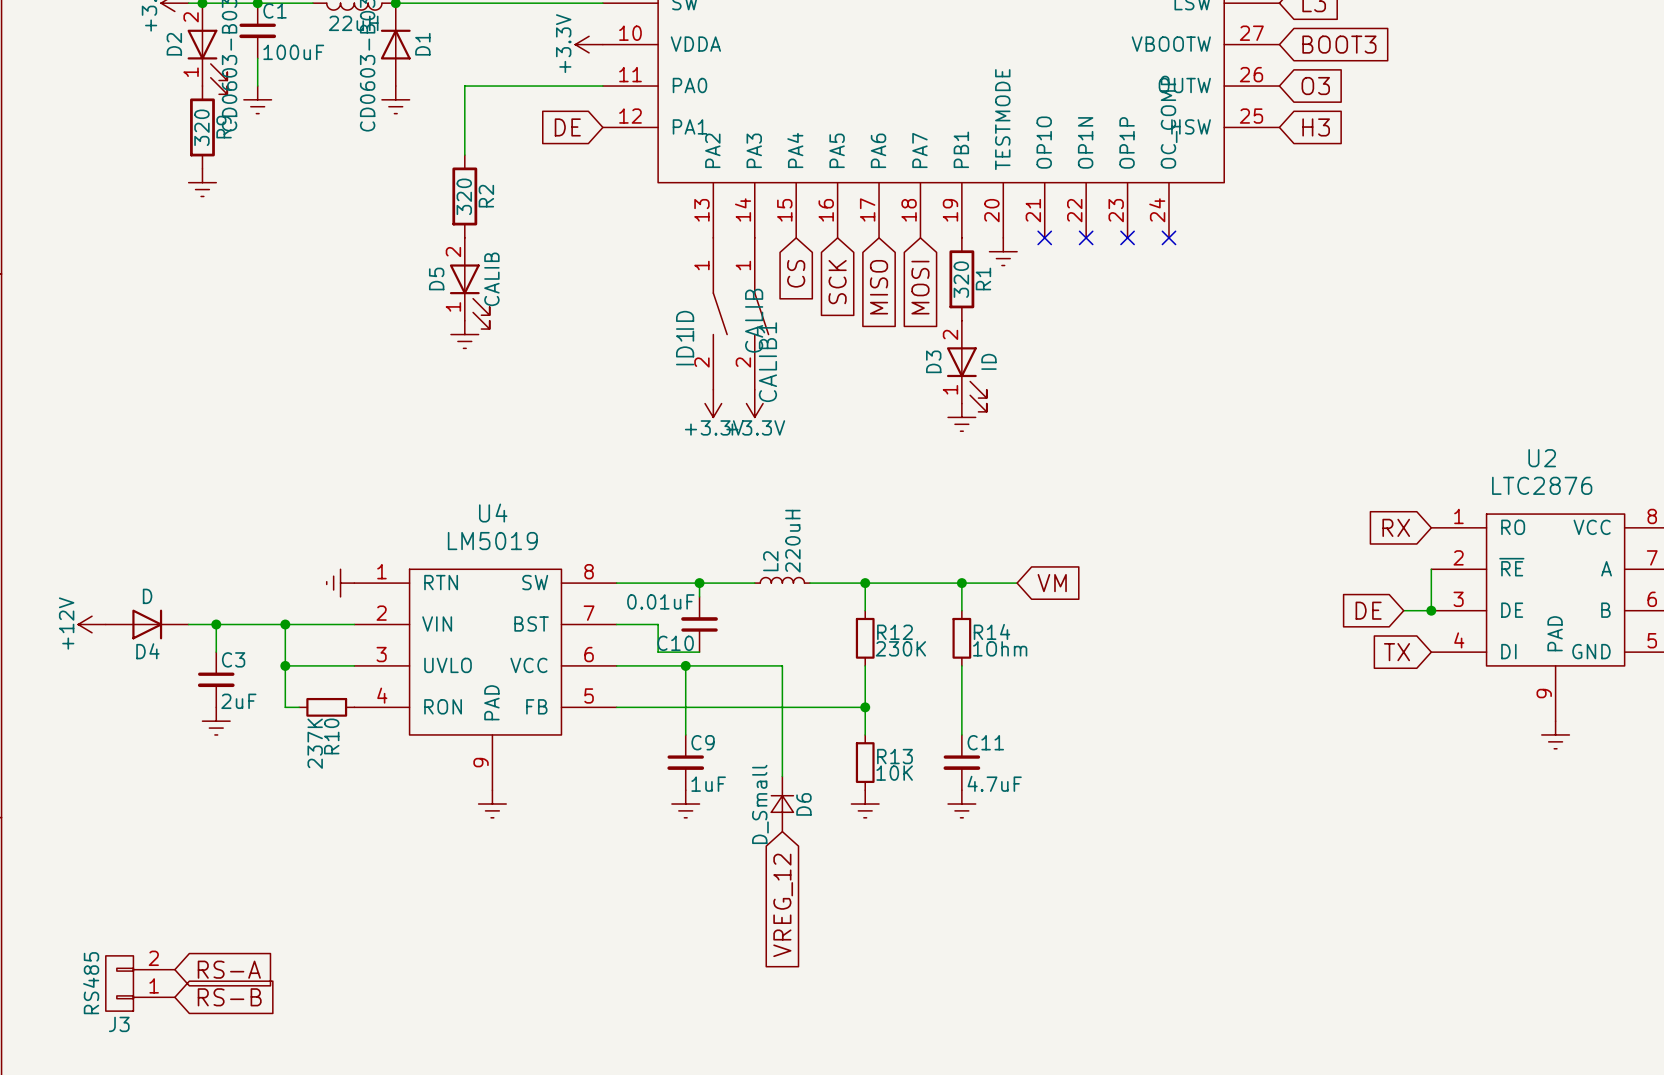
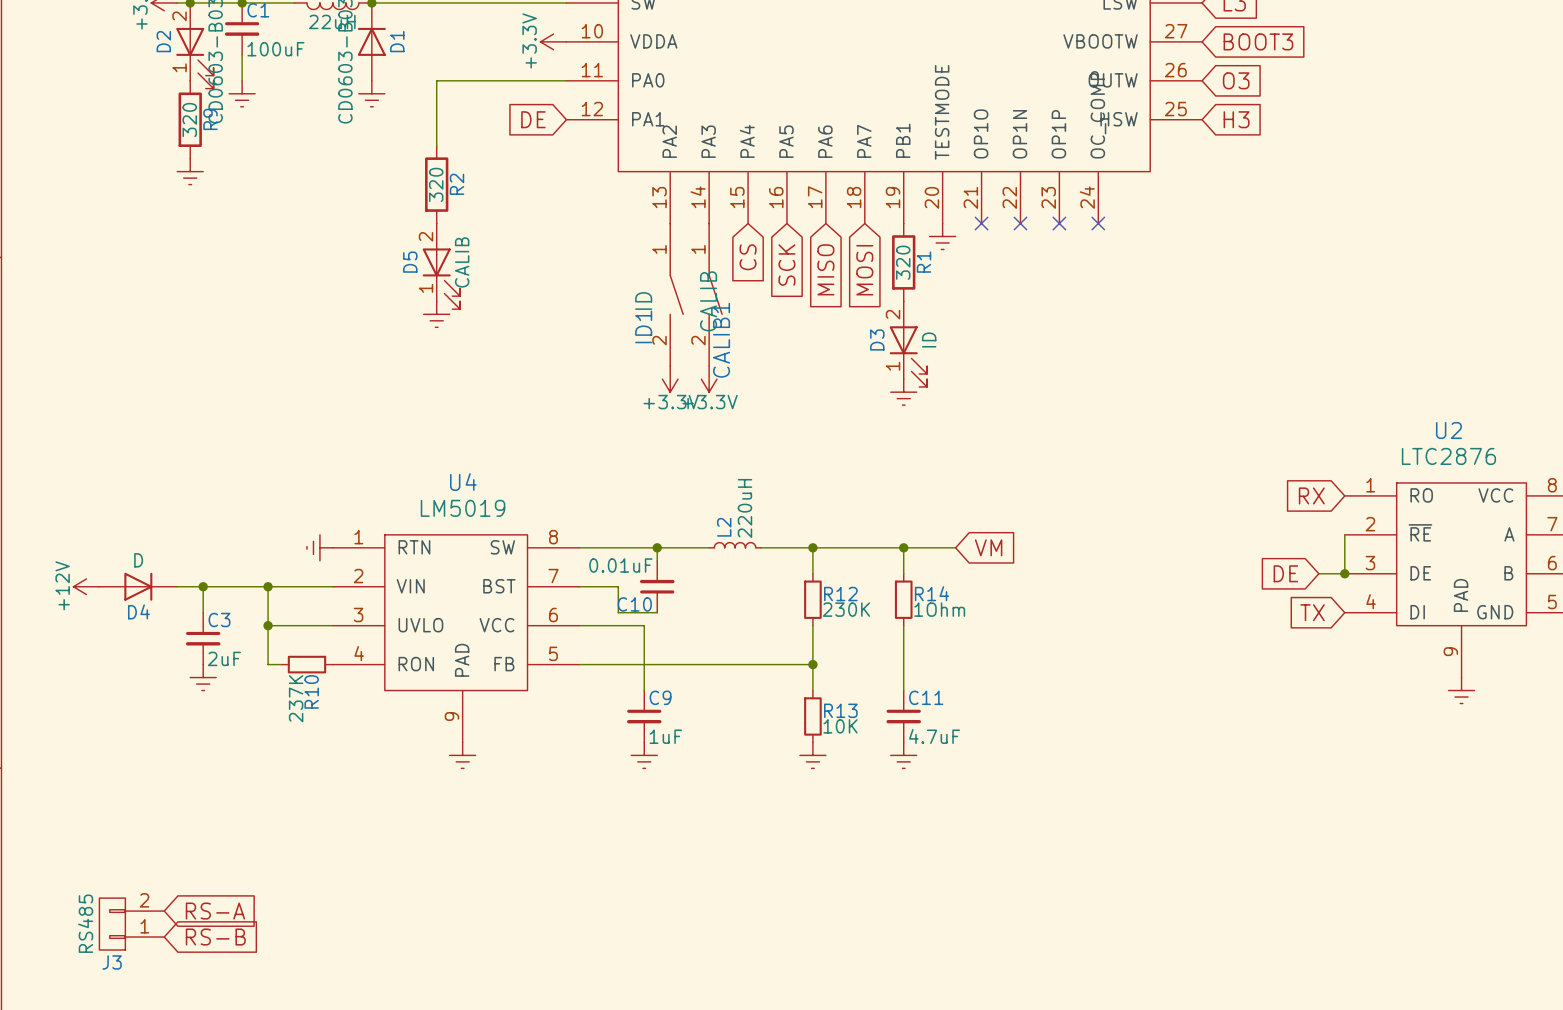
wire: (685, 665) (782, 665) (782, 776) -> none
junction: (685, 665) -> none
D6: D_Small (782, 804) -> none
global label: VREG_12 (783, 905) -> none

